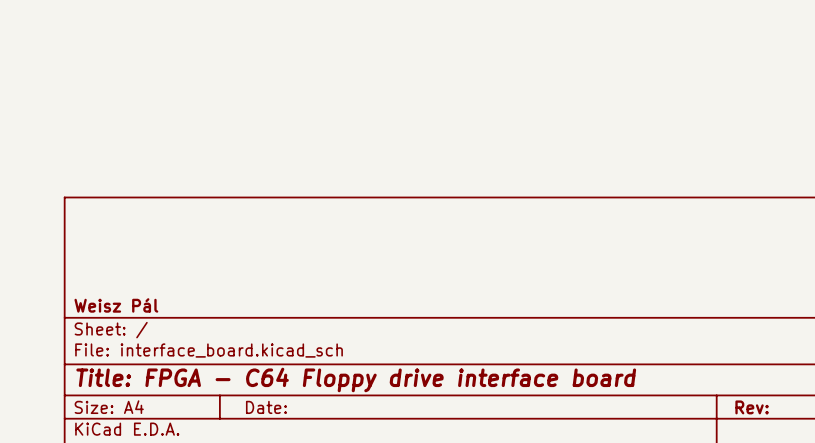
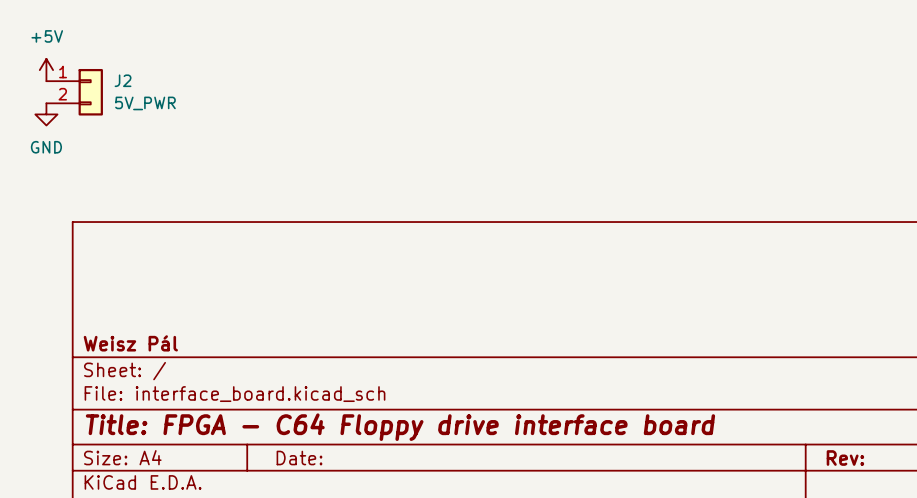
power symbol: none -> +5V (46, 70)
J2: none -> 5V_PWR (74, 92)
power symbol: none -> GND (46, 114)

